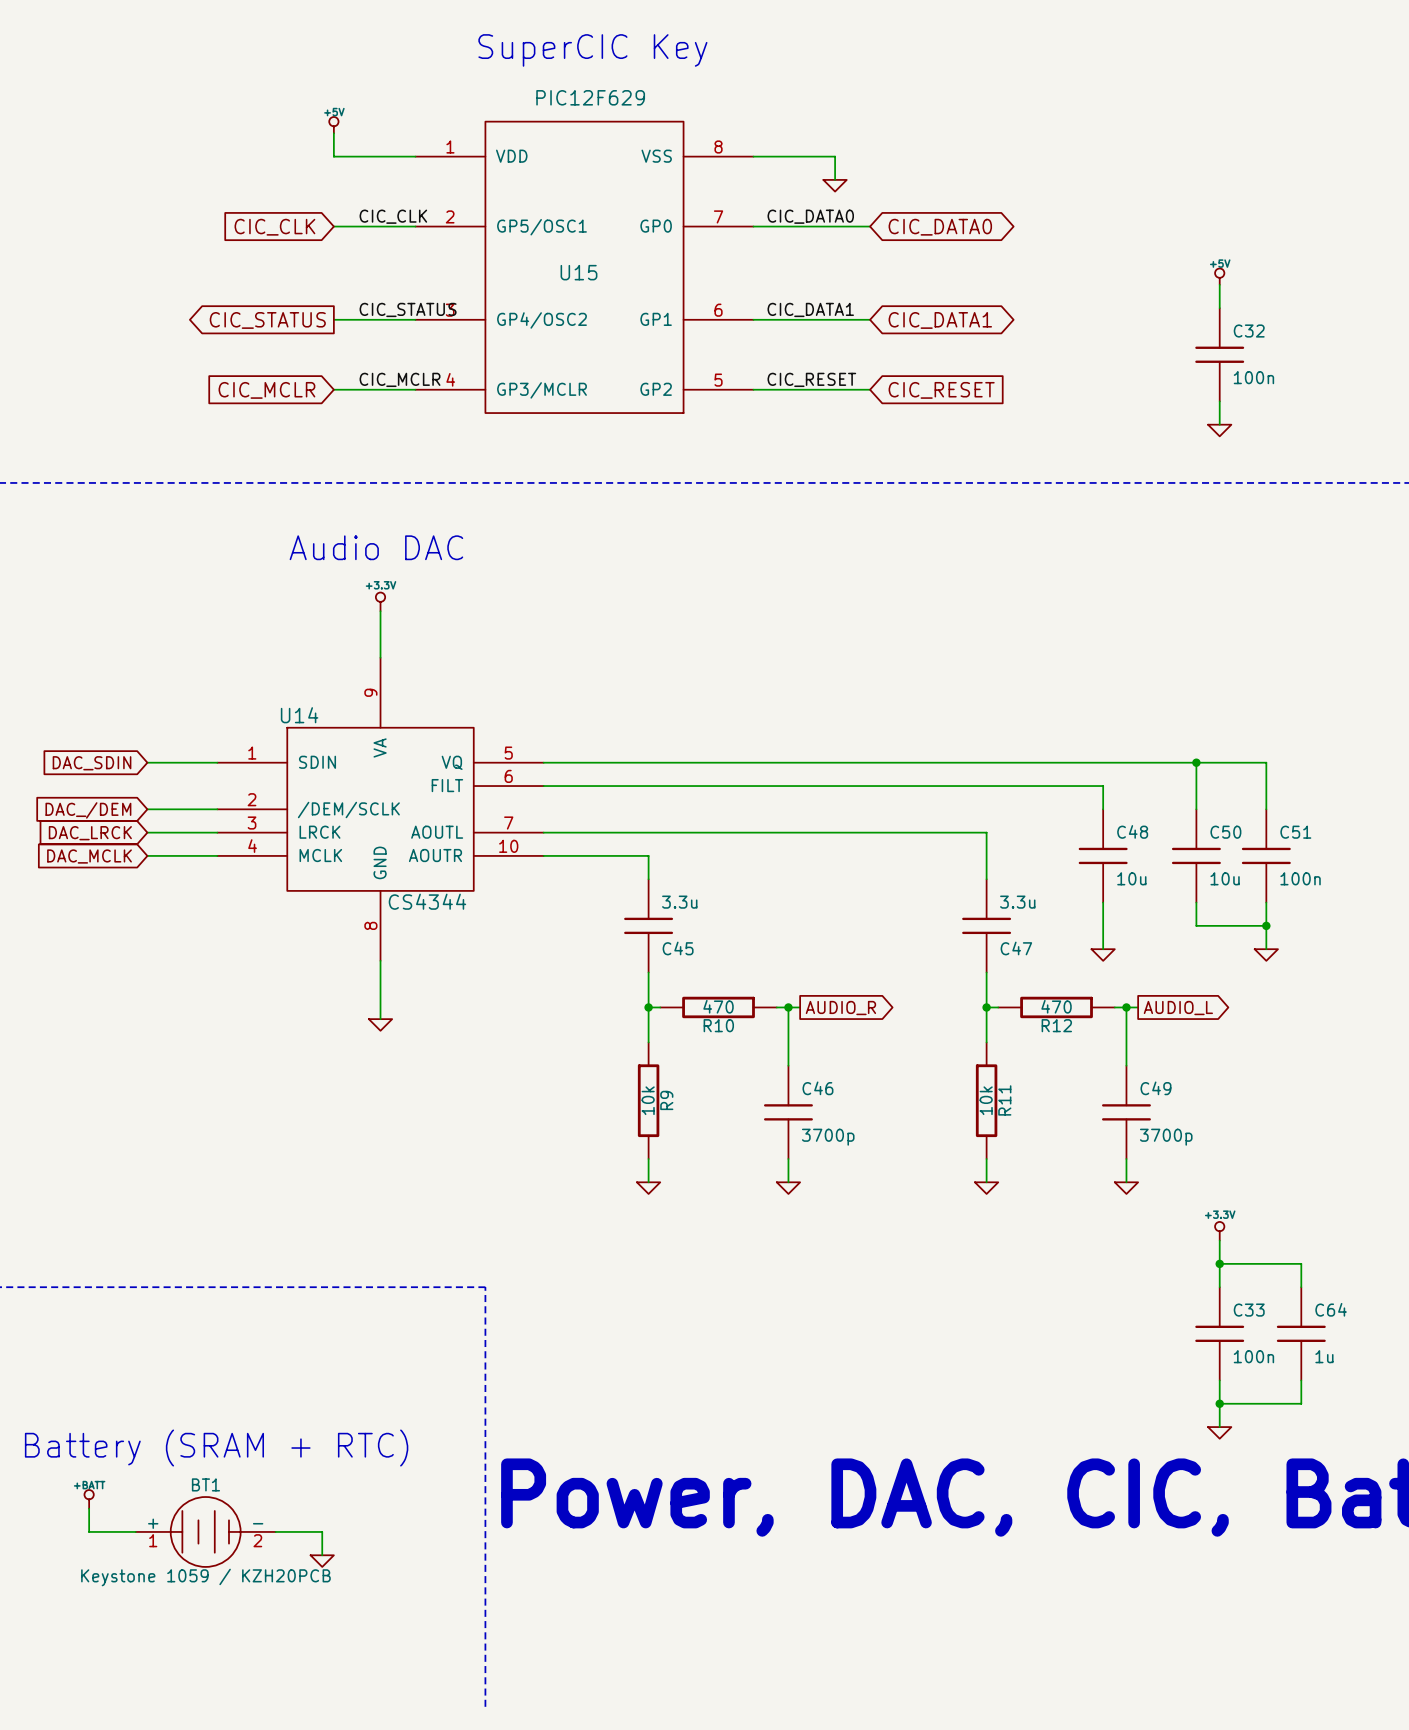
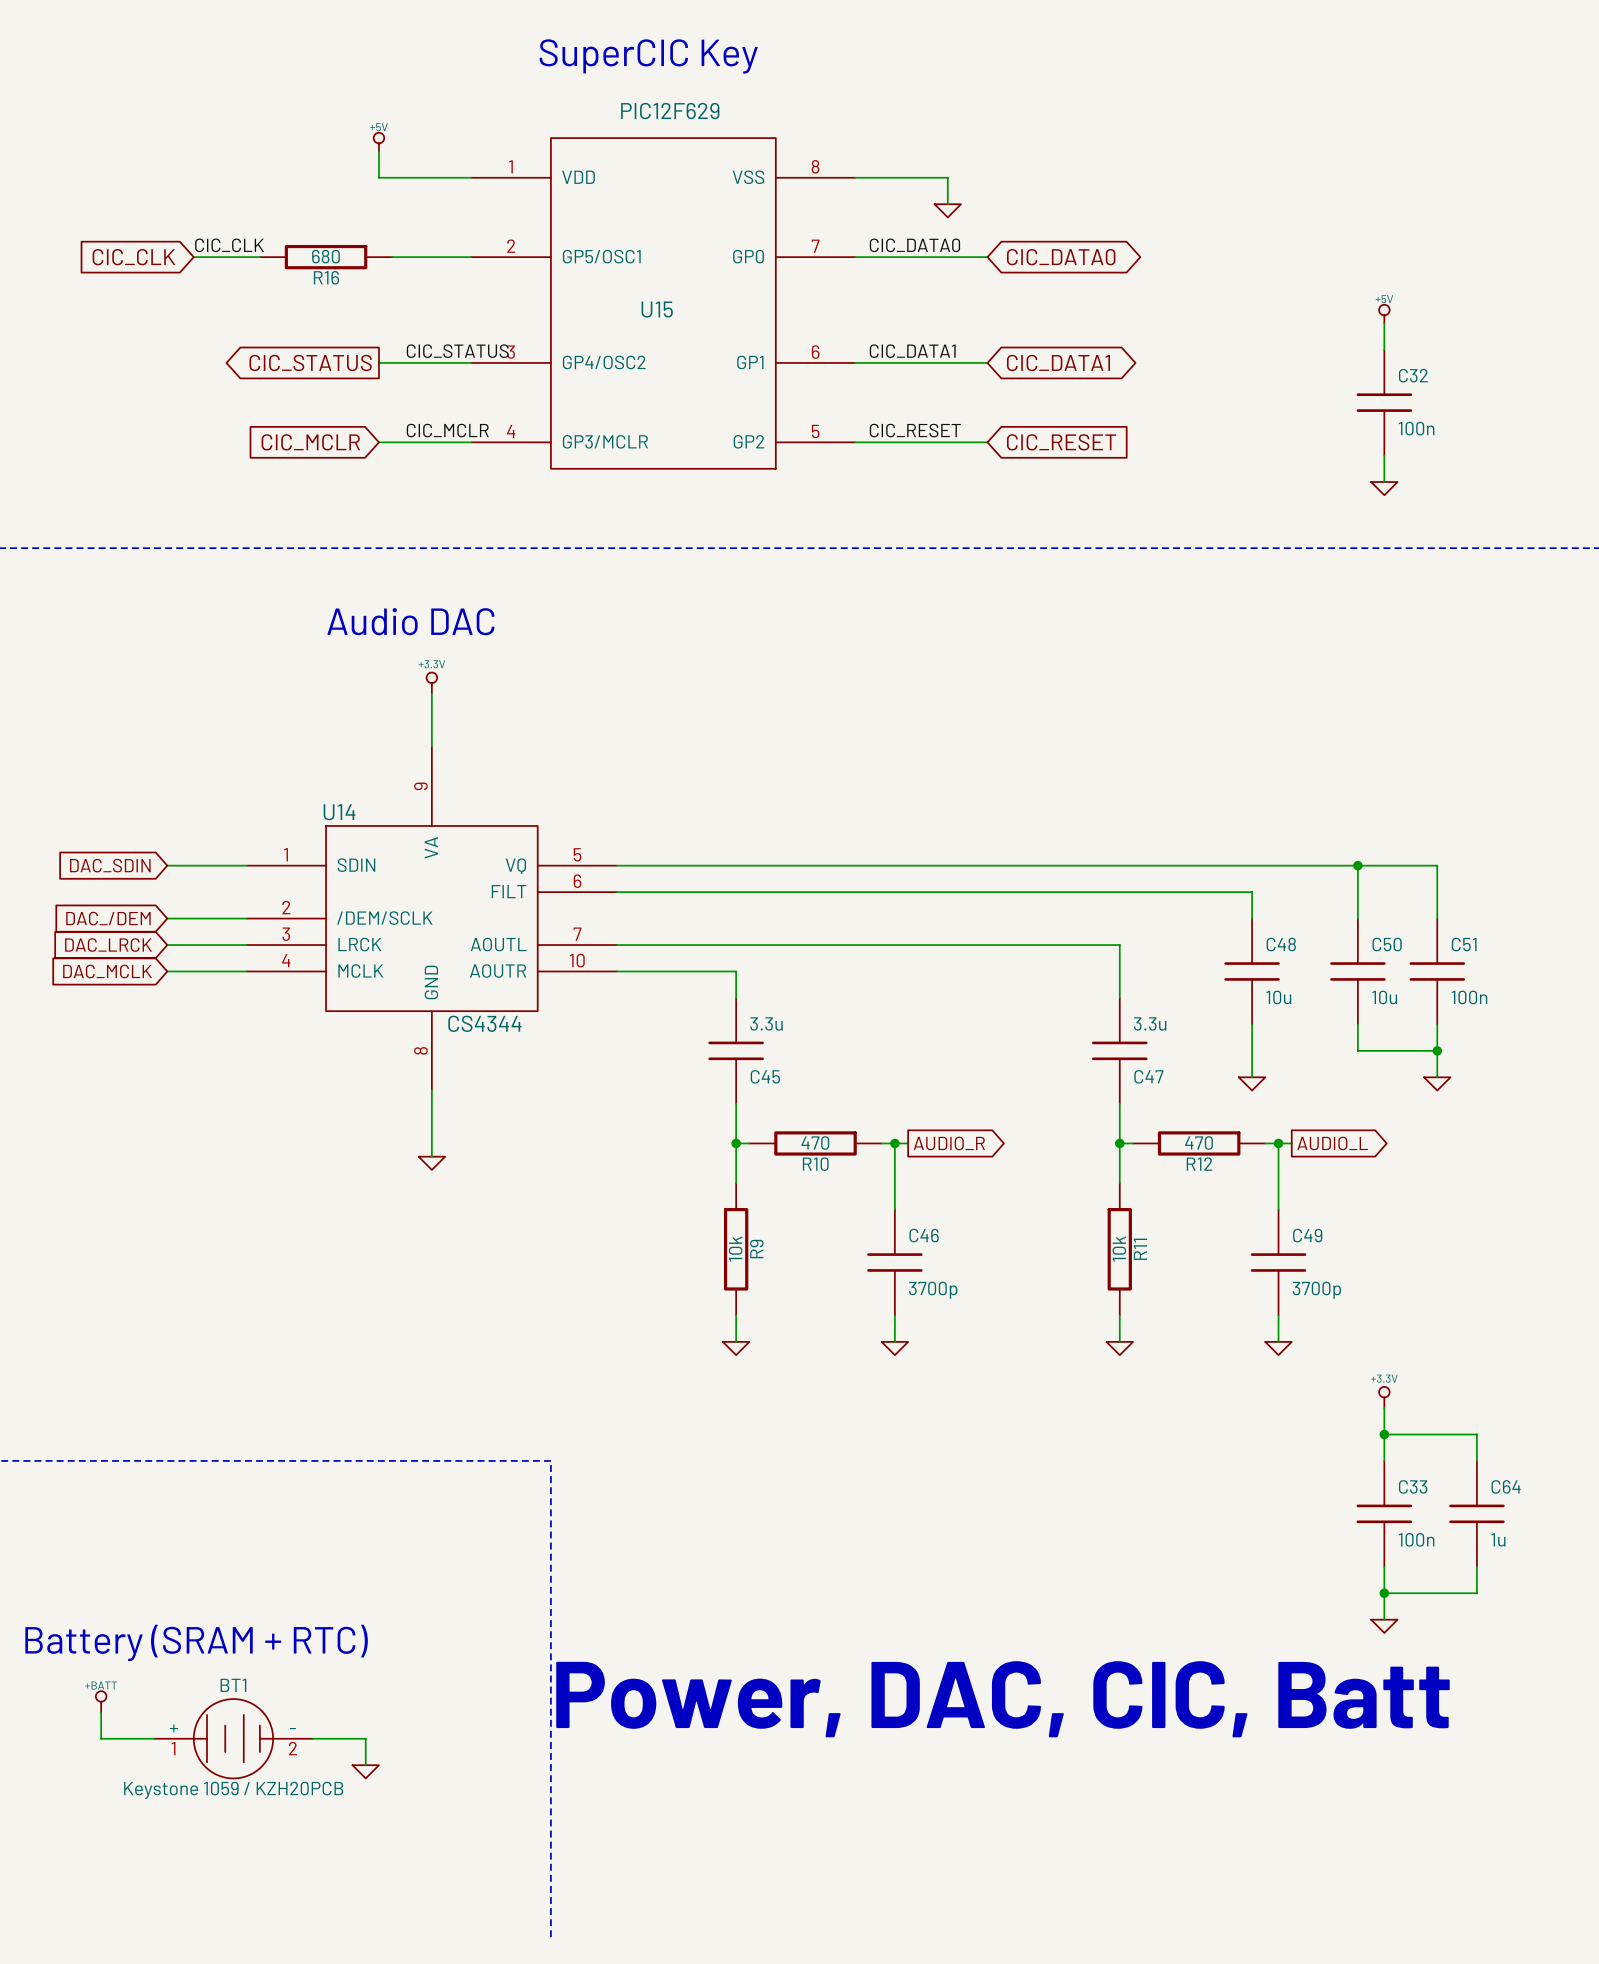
label position: CIC_CLK (393, 216) -> CIC_CLK (229, 245)
wire: none -> (193, 257) (259, 257)
R16: none -> 680 (326, 257)
global label position: CIC_CLK (274, 227) -> CIC_CLK (133, 257)

